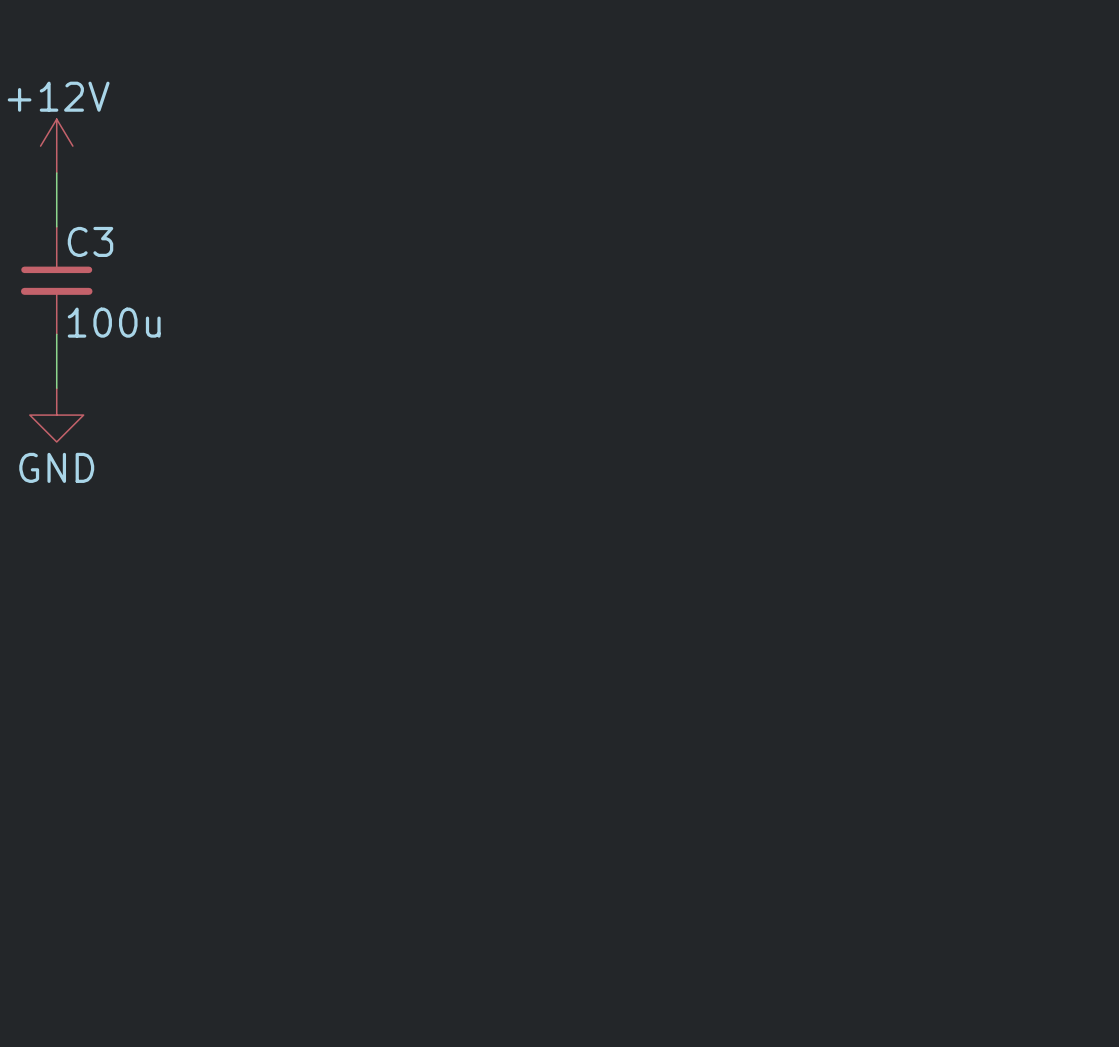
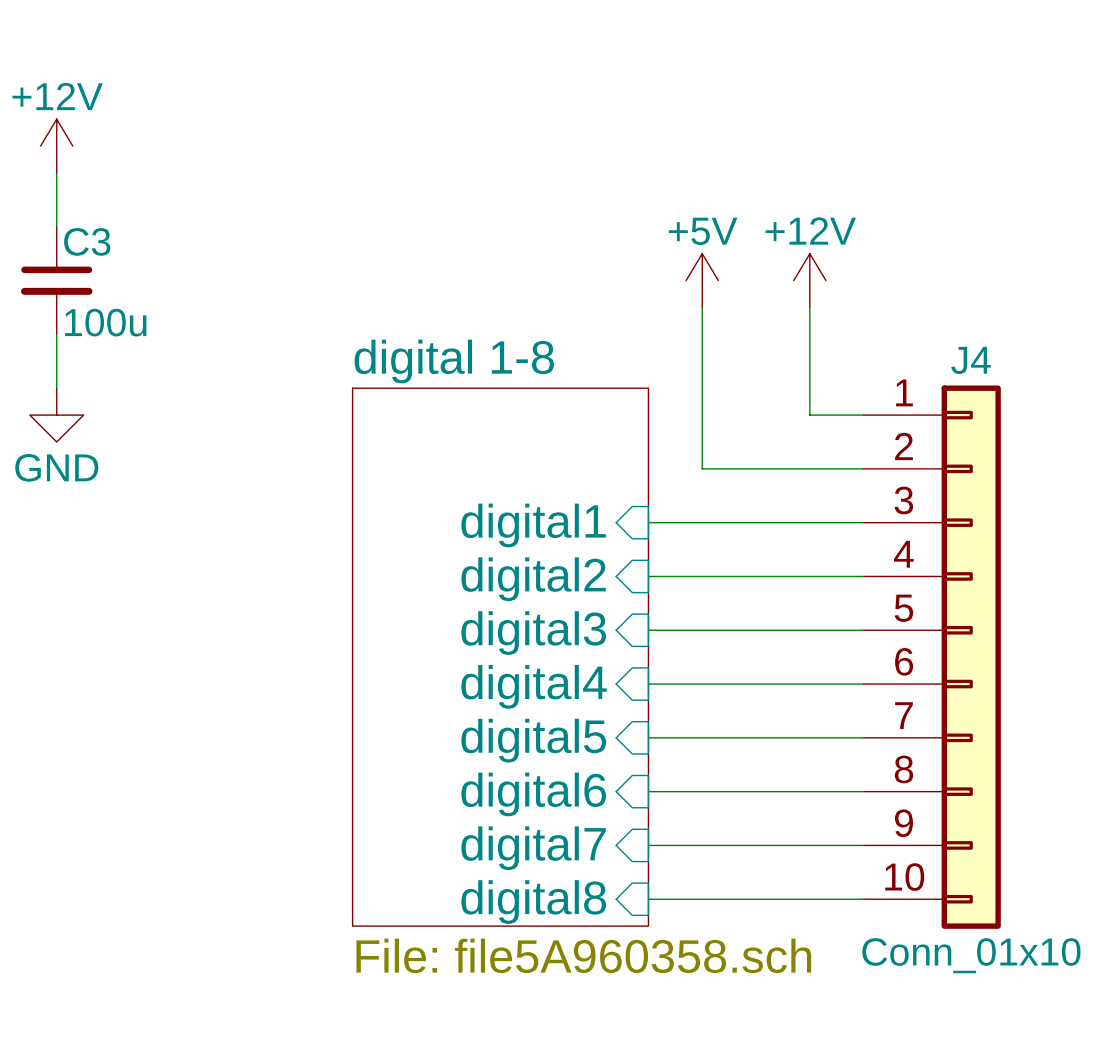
power symbol: none -> +5V (702, 280)
power symbol: none -> +12V (809, 280)
wire: none -> (702, 307) (702, 468) (863, 468)
wire: none -> (809, 307) (809, 415) (863, 415)
wire: none -> (648, 522) (863, 522)
sheet pin: none -> digital1 (533, 525)
wire: none -> (648, 576) (863, 576)
sheet pin: none -> digital2 (533, 579)
wire: none -> (648, 630) (863, 630)
sheet pin: none -> digital3 (533, 633)
sheet digital 1-8: none -> File: file5A960358.sch (500, 657)
J4: none -> Conn_01x10 (932, 657)
wire: none -> (648, 684) (863, 684)
sheet pin: none -> digital4 (534, 686)
wire: none -> (648, 737) (863, 737)
sheet pin: none -> digital5 (533, 740)
wire: none -> (648, 791) (863, 791)
sheet pin: none -> digital6 (533, 794)
wire: none -> (648, 845) (863, 845)
sheet pin: none -> digital7 (533, 848)
wire: none -> (648, 899) (863, 899)
sheet pin: none -> digital8 (533, 902)

